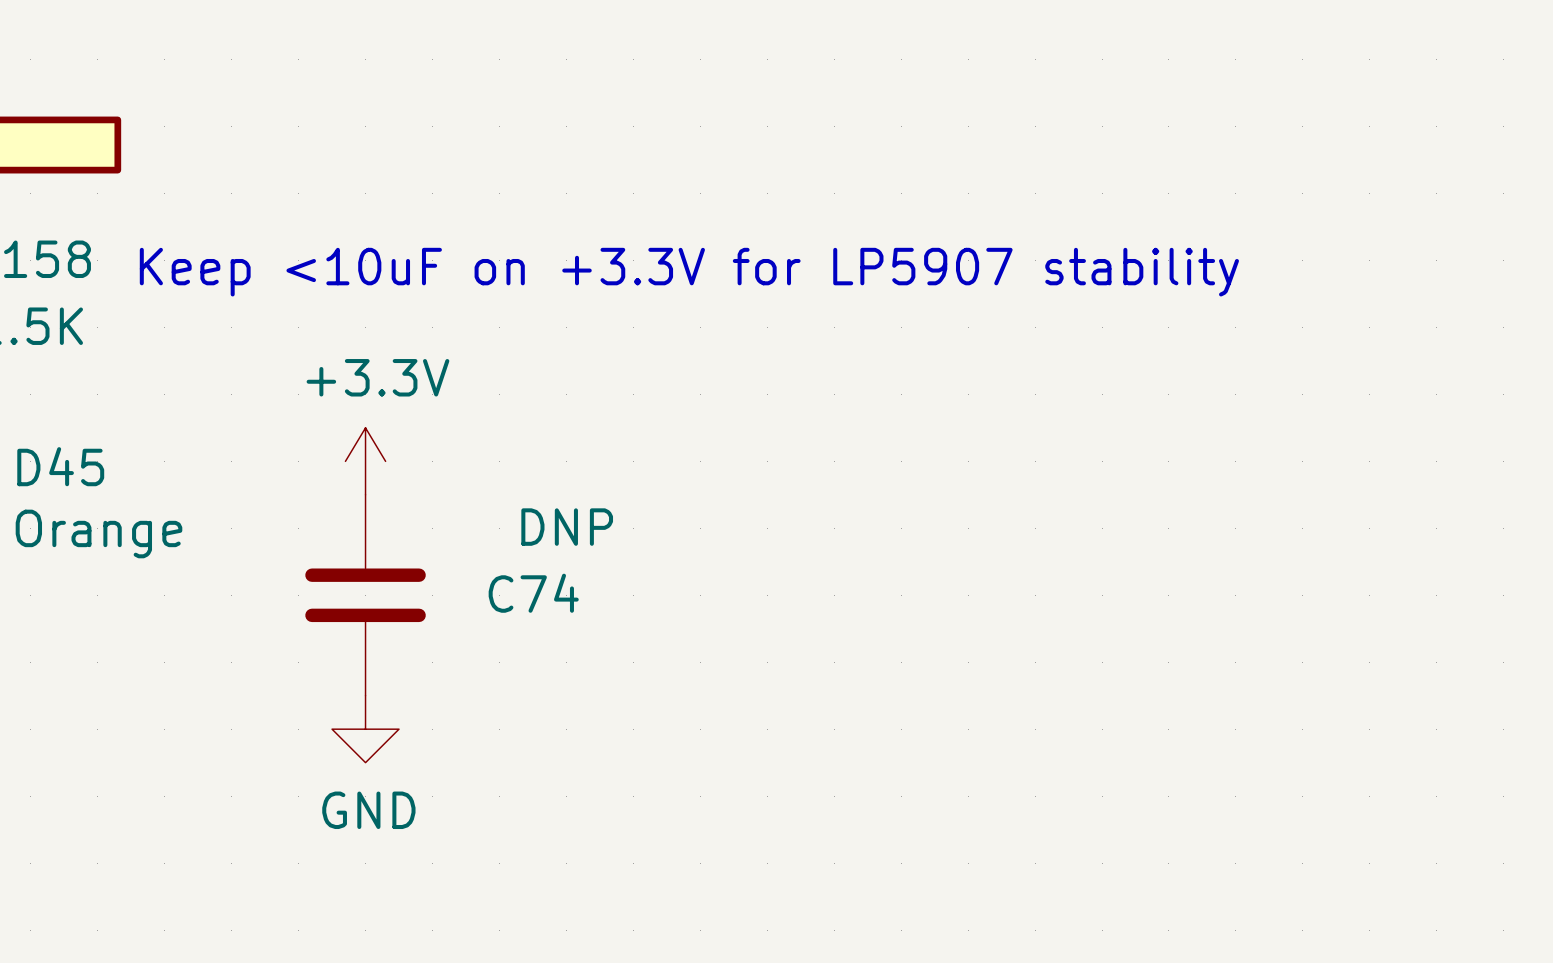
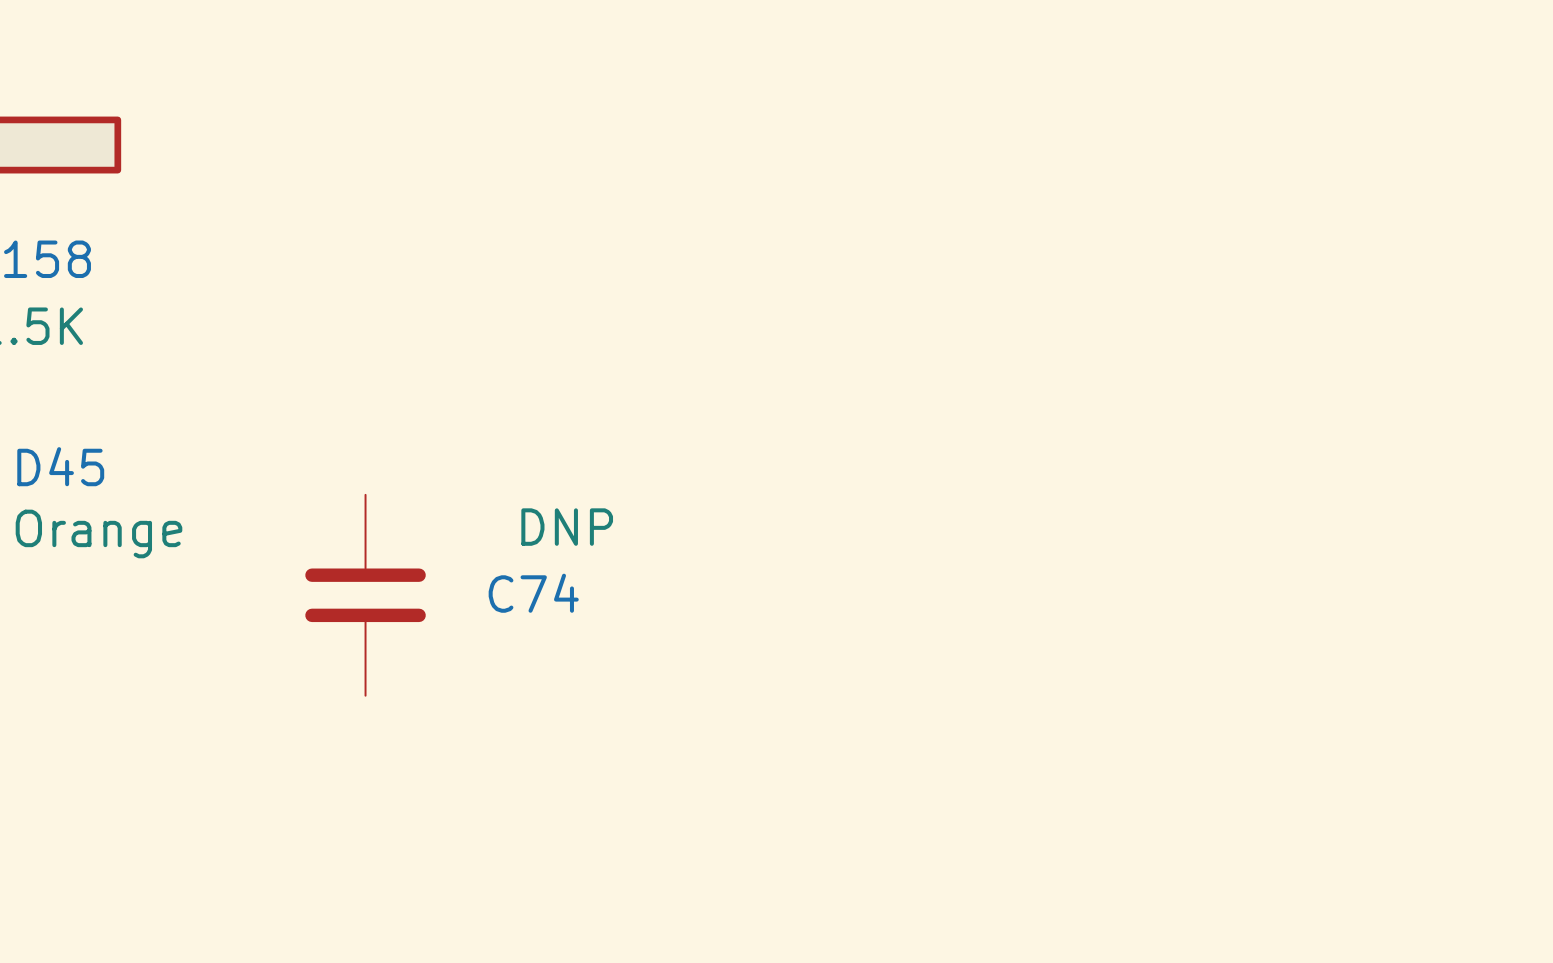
text: Keep <10uF on +3.3V for LP5907 stability (689, 272) -> none
power symbol: +3.3V (365, 461) -> none
power symbol: GND (365, 729) -> none

